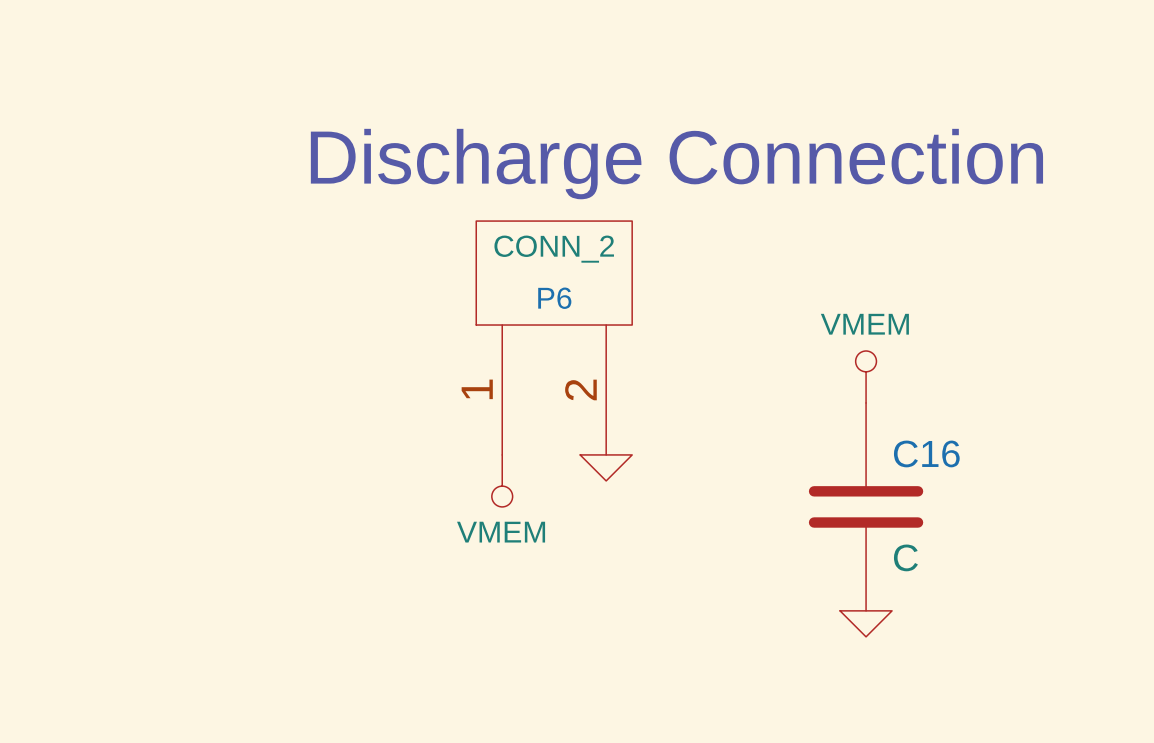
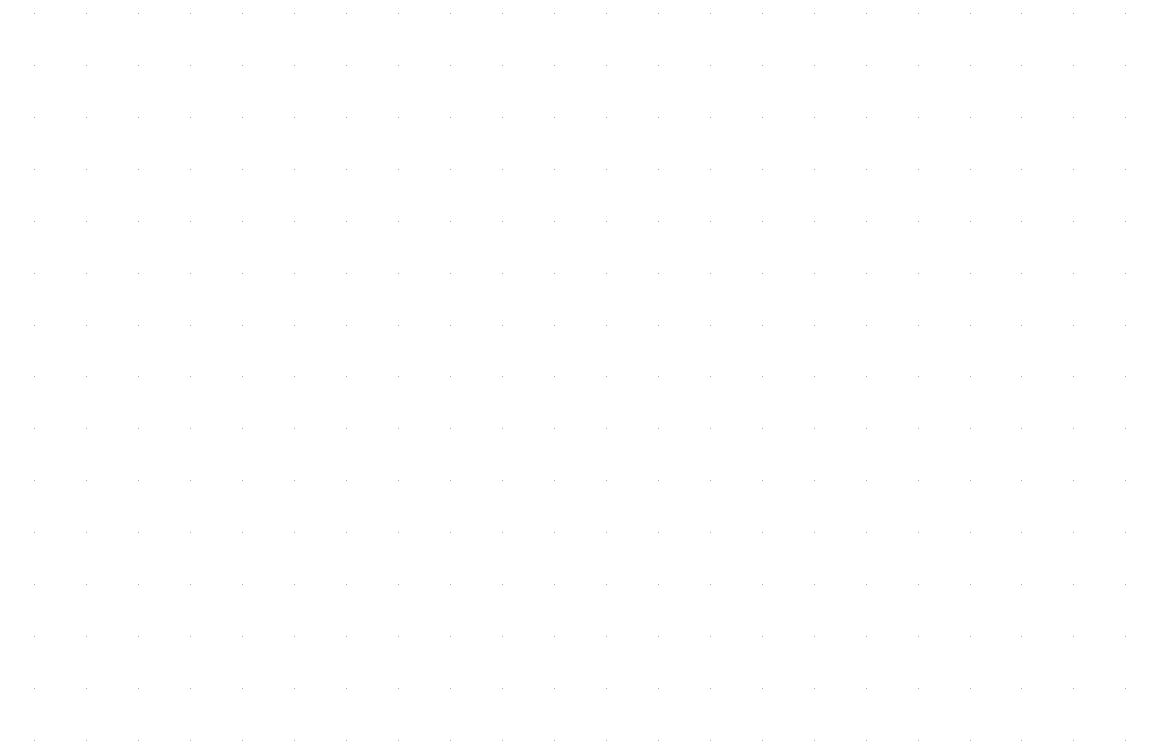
text: Discharge Connection (676, 164) -> none
P6: CONN_2 (554, 338) -> none
power symbol: VMEM (866, 376) -> none
power symbol: (606, 467) -> none
power symbol: VMEM (502, 480) -> none
C16: C (866, 506) -> none
power symbol: (866, 623) -> none

